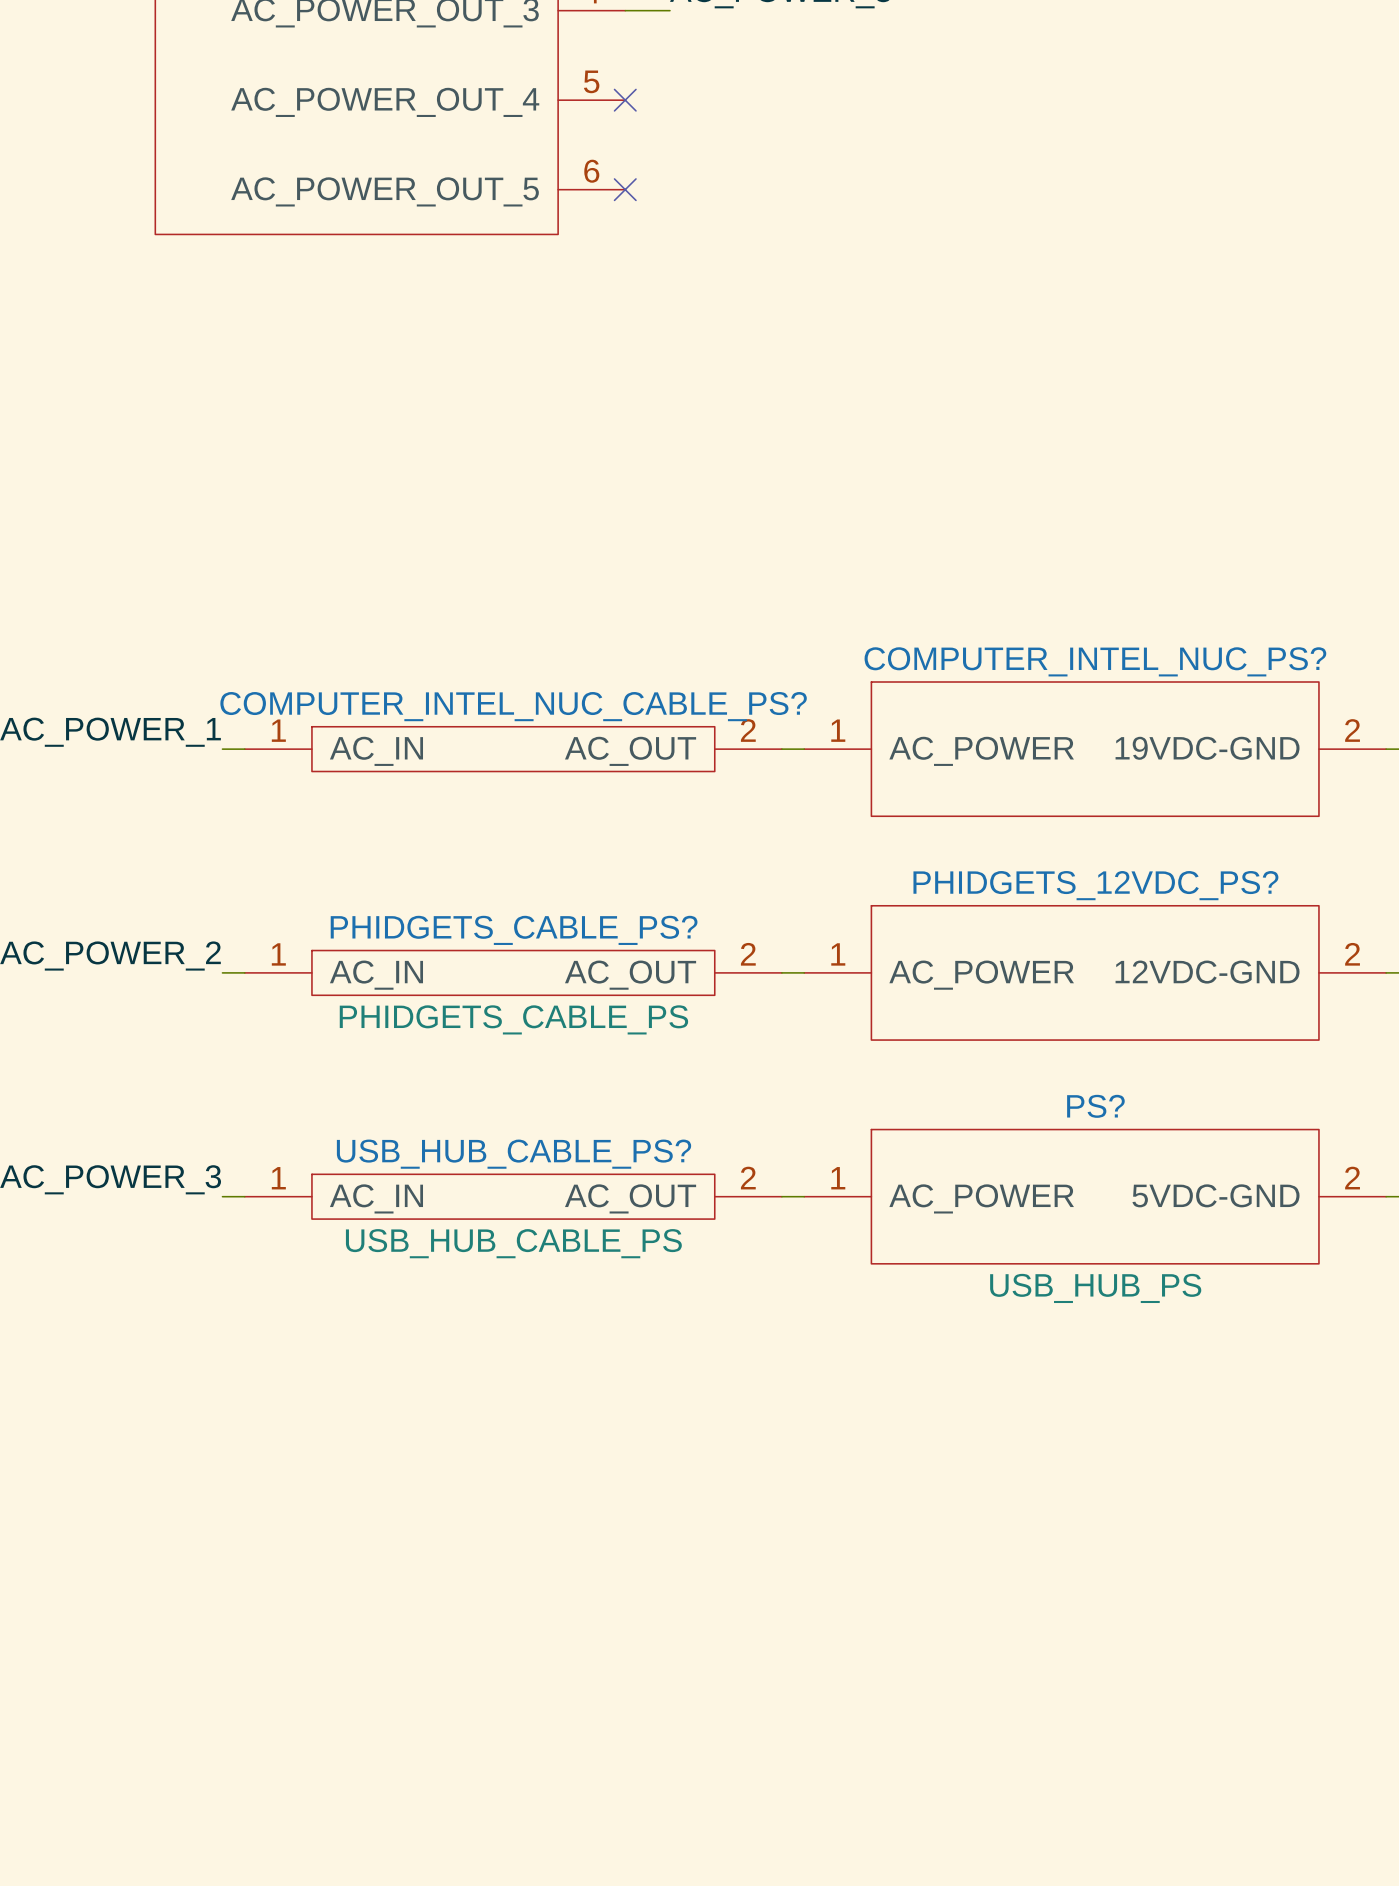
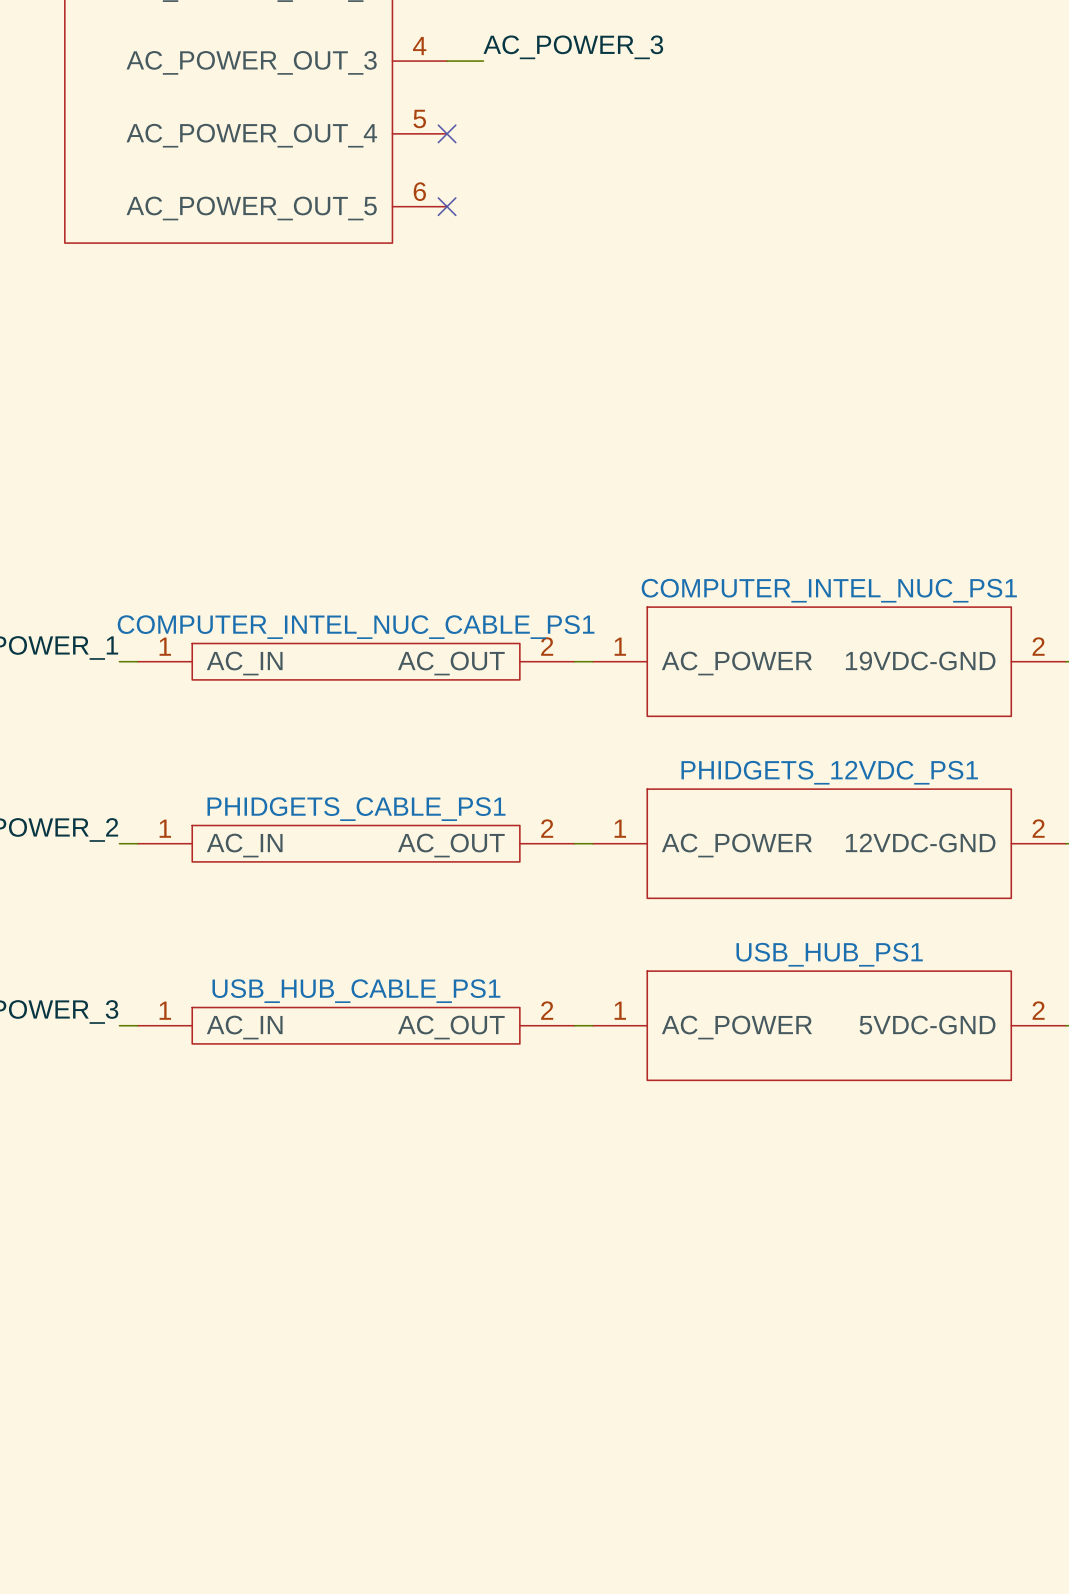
COMPUTER_INTEL_NUC_PS? name: COMPUTER_INTEL_NUC_PS? (1095, 661) -> COMPUTER_INTEL_NUC_PS1 (829, 590)
COMPUTER_INTEL_NUC_CABLE_PS? name: COMPUTER_INTEL_NUC_CABLE_PS? (513, 706) -> COMPUTER_INTEL_NUC_CABLE_PS1 (356, 627)
PHIDGETS_12VDC_PS? name: PHIDGETS_12VDC_PS? (1095, 885) -> PHIDGETS_12VDC_PS1 (829, 772)
PHIDGETS_CABLE_PS? name: PHIDGETS_CABLE_PS? (514, 930) -> PHIDGETS_CABLE_PS1 (356, 809)
PHIDGETS_CABLE_PS? value: PHIDGETS_CABLE_PS (513, 1019) -> none
PS? name: PS? (1095, 1106) -> USB_HUB_PS1 (829, 954)
USB_HUB_CABLE_PS? name: USB_HUB_CABLE_PS? (514, 1154) -> USB_HUB_CABLE_PS1 (356, 991)
USB_HUB_CABLE_PS? value: USB_HUB_CABLE_PS (513, 1243) -> none
PS? value: USB_HUB_PS (1095, 1288) -> none

